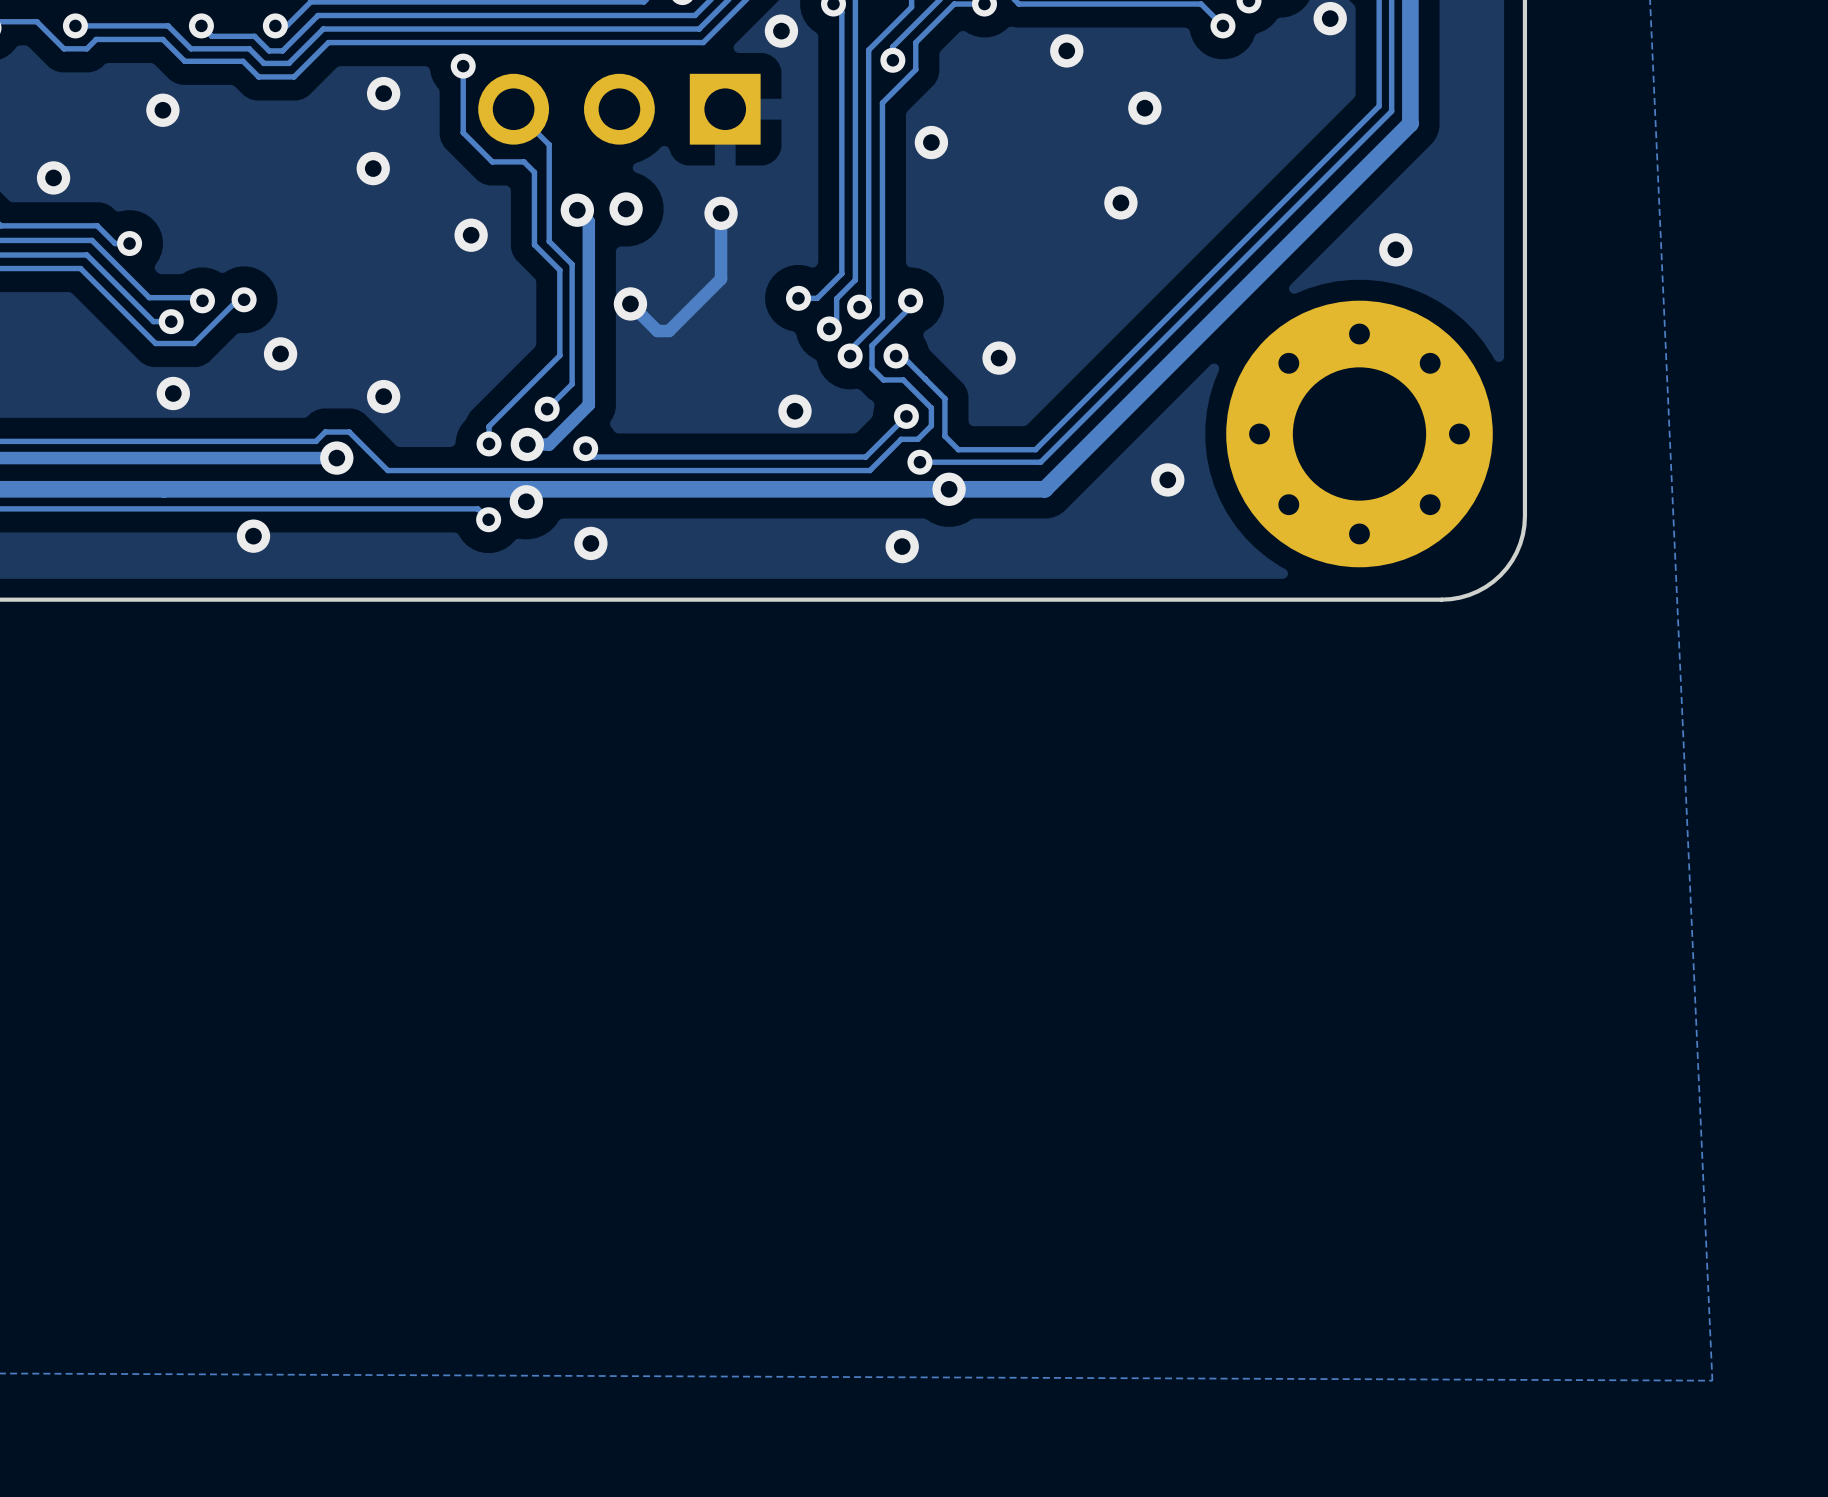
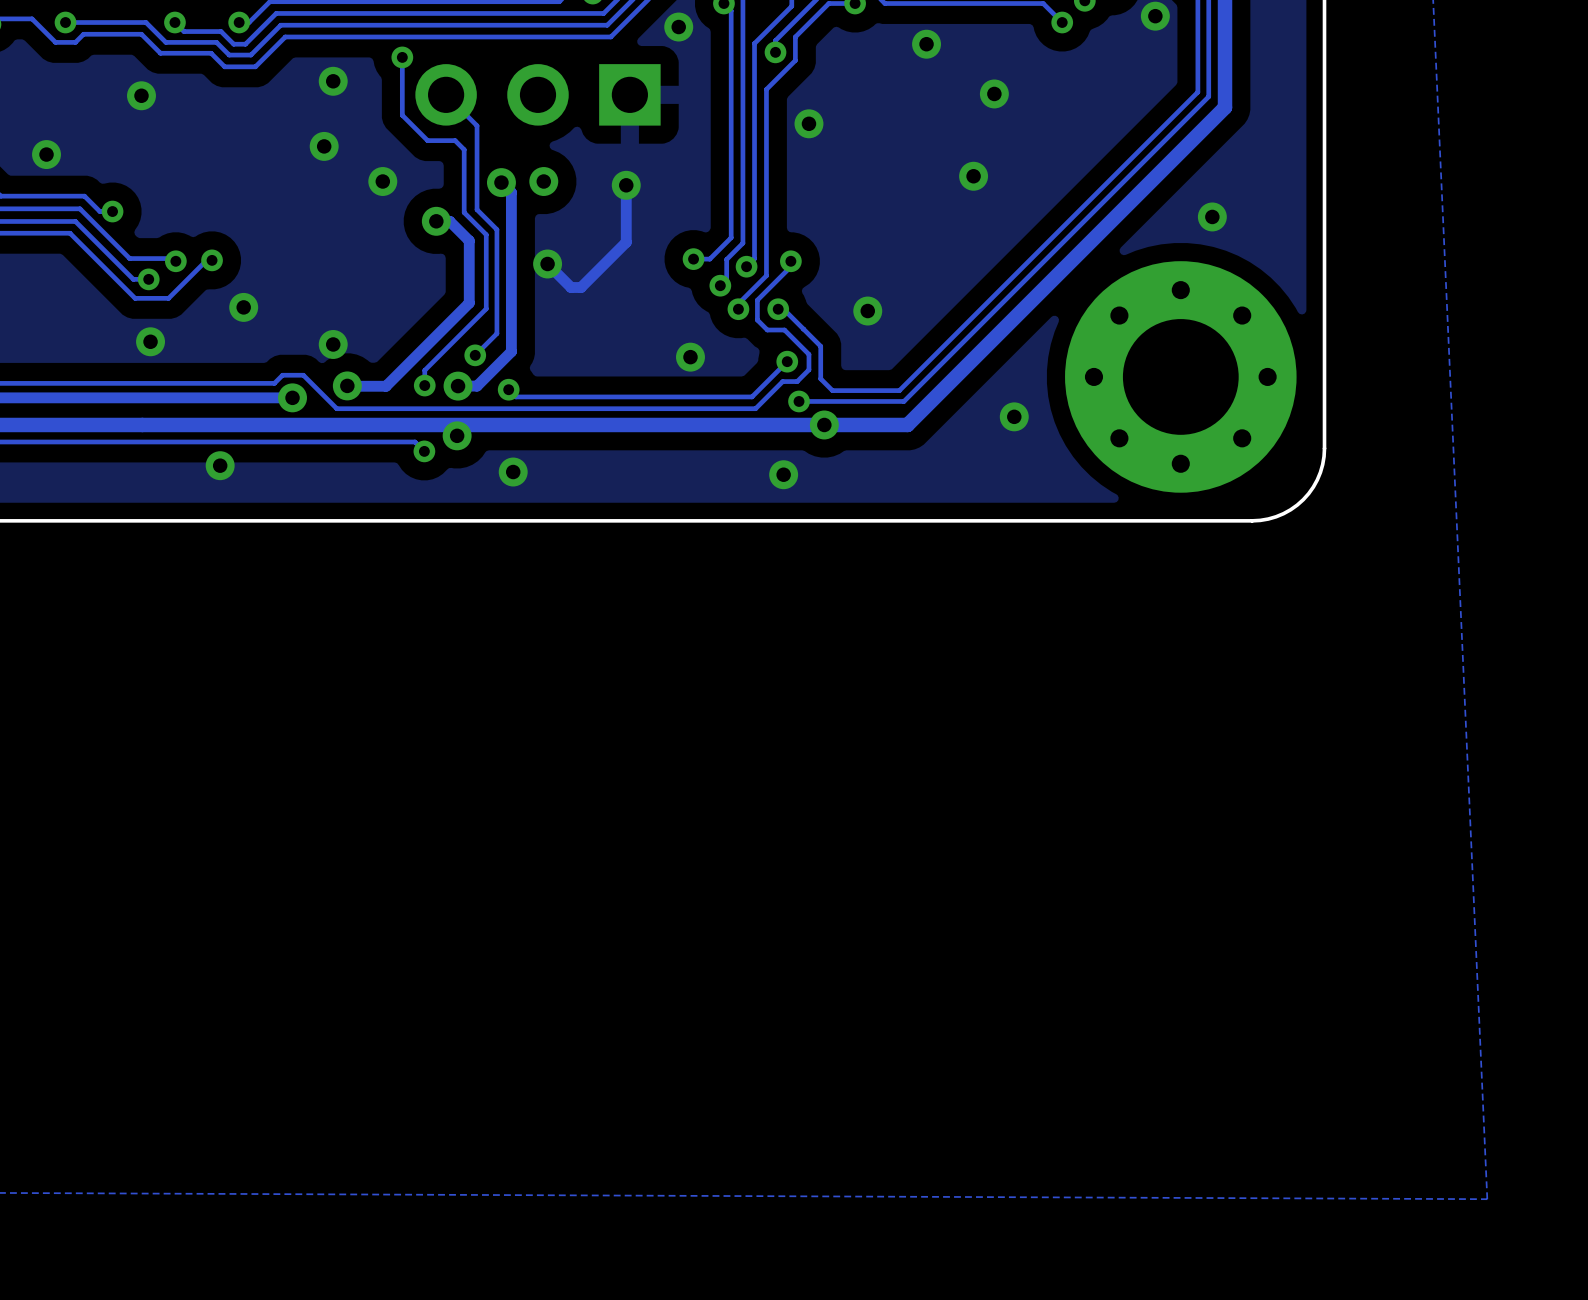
via: none -> (382, 181)
via: (471, 235) -> none
track: none -> (436, 221) (449, 221) (469, 240) (469, 303) (386, 386) (347, 386)
via: none -> (436, 221)
via: none -> (347, 385)

